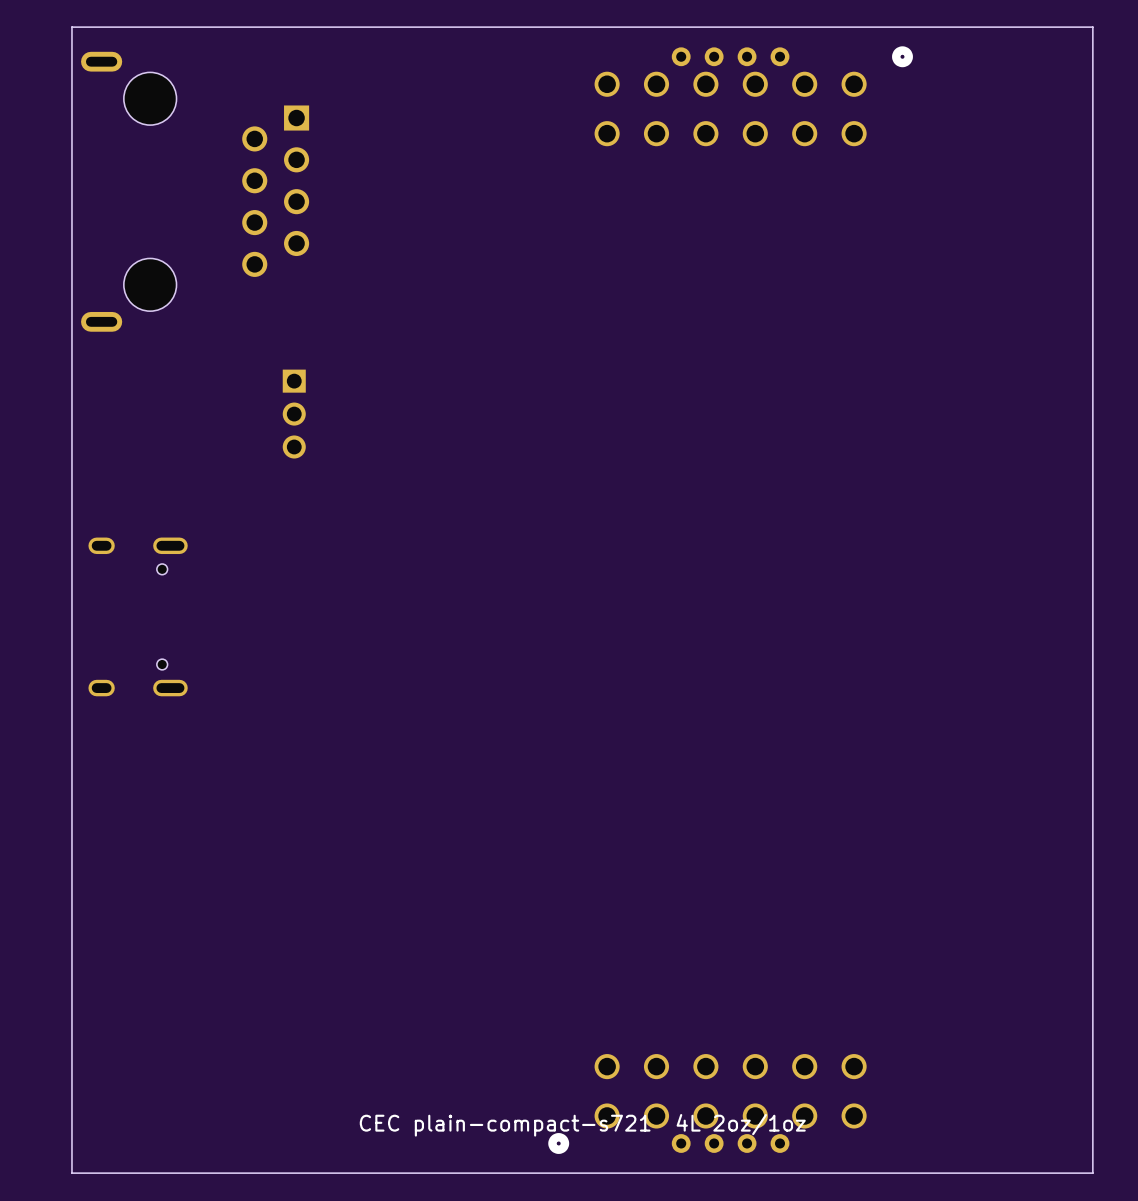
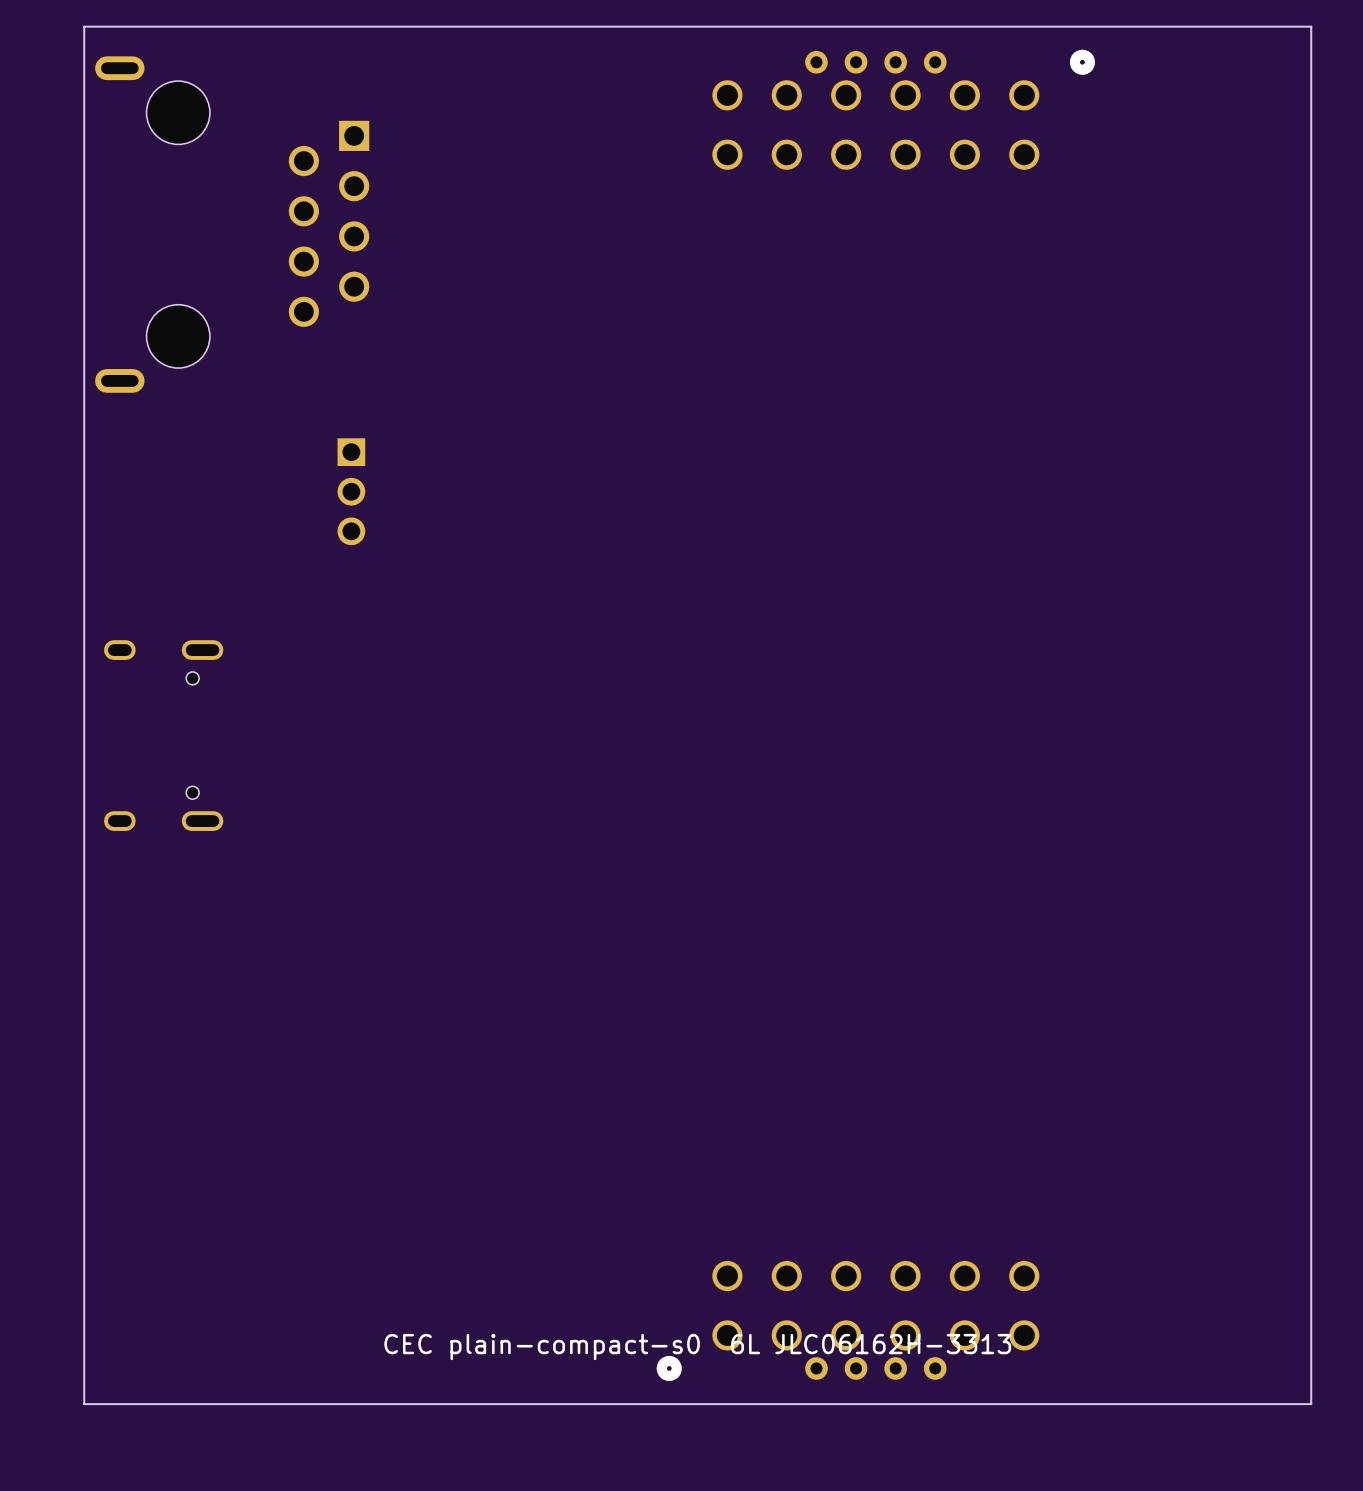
text: CEC plain-compact-s721 4L 2oz/1oz (582, 1125) -> CEC plain-compact-s0 6L JLC06162H-3313 (697, 1347)

